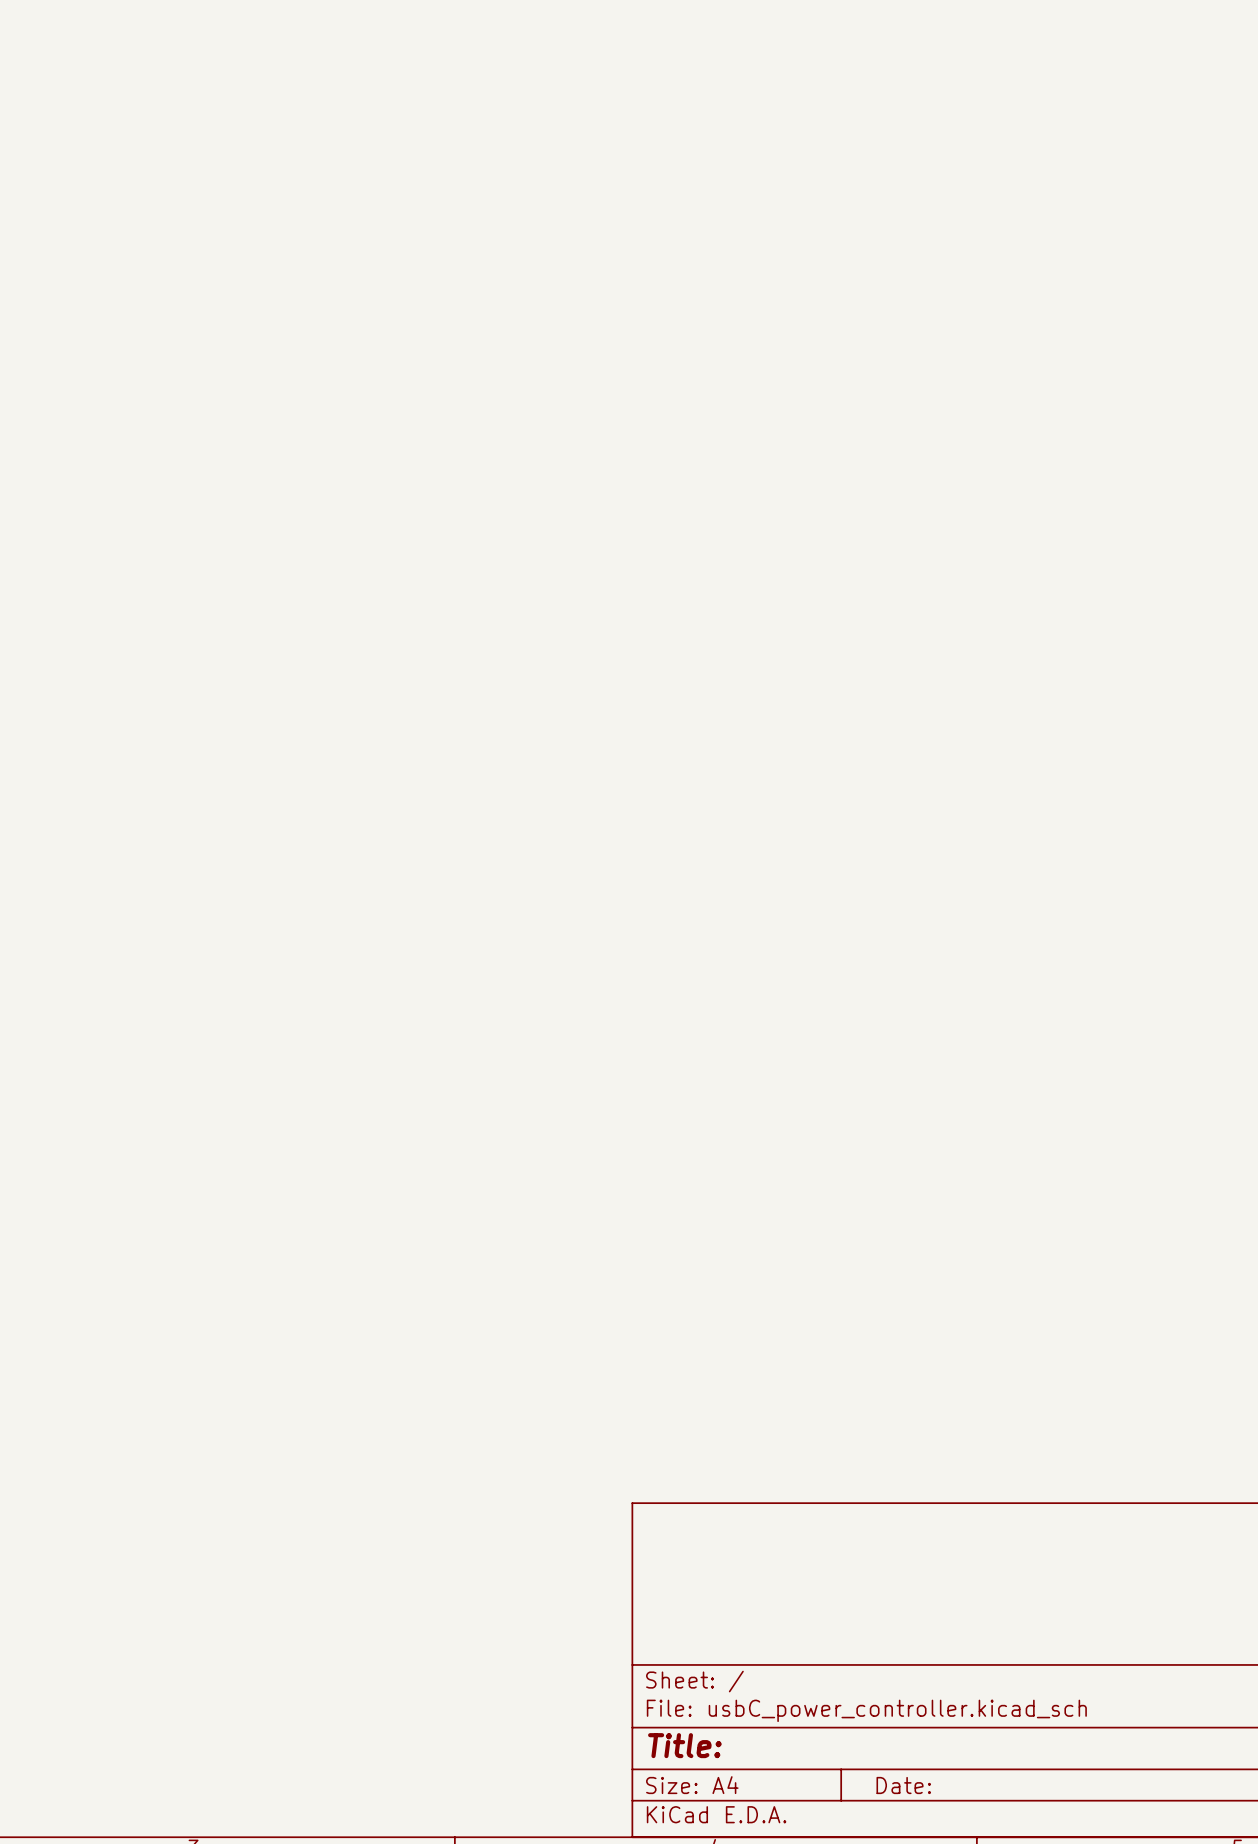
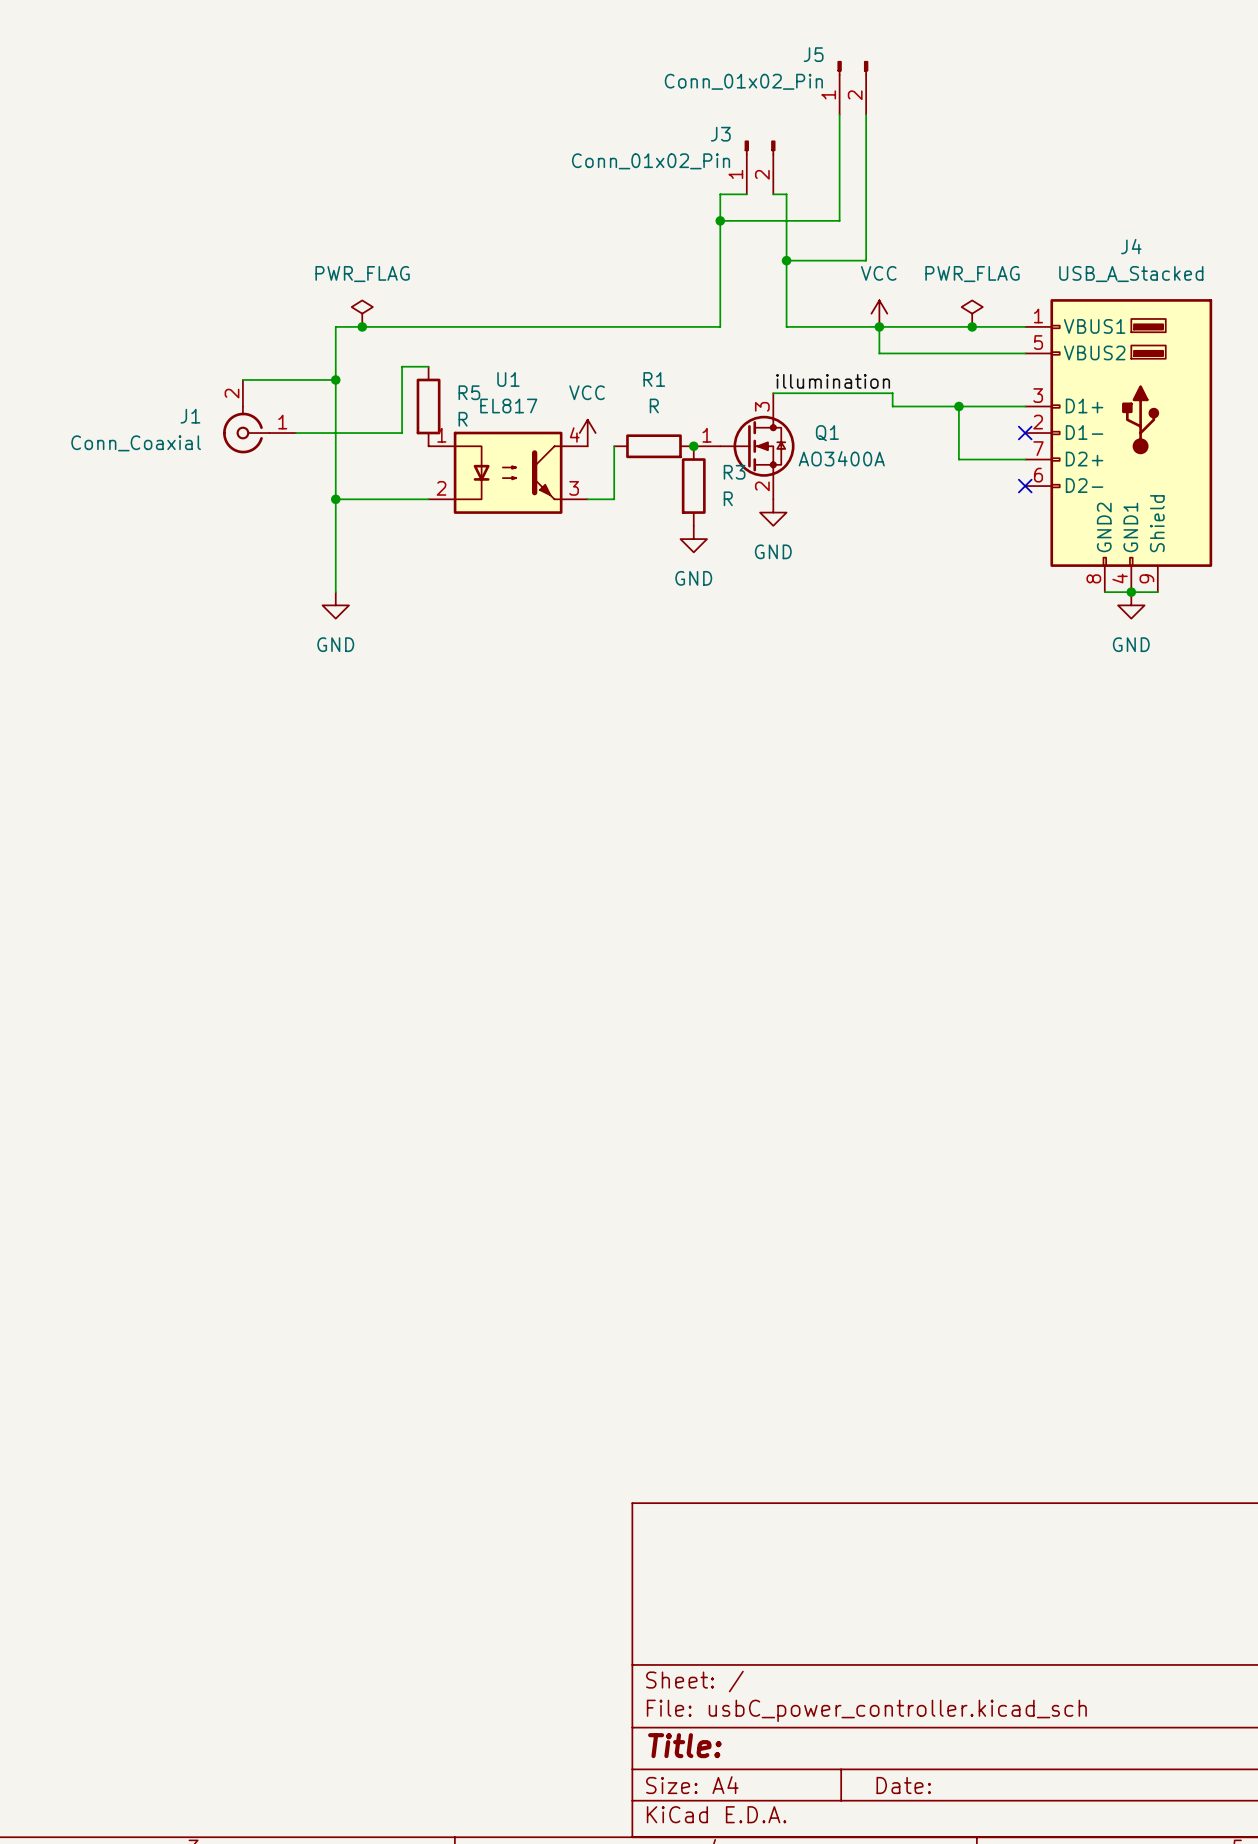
J5: none -> Conn_01x02_Pin (852, 87)
wire: none -> (839, 114) (839, 220) (720, 220)
wire: none -> (866, 114) (866, 260) (786, 260)
J3: none -> Conn_01x02_Pin (760, 167)
wire: none -> (746, 194) (720, 194) (720, 326) (335, 326) (335, 592)
wire: none -> (773, 194) (786, 194) (786, 326) (1025, 326)
junction: none -> (720, 220)
junction: none -> (786, 260)
power symbol: none -> PWR_FLAG (362, 313)
power symbol: none -> VCC (879, 313)
power symbol: none -> PWR_FLAG (972, 313)
junction: none -> (362, 326)
wire: none -> (879, 326) (879, 353) (1025, 353)
junction: none -> (879, 326)
junction: none -> (972, 326)
wire: none -> (428, 366) (402, 366) (402, 433) (295, 433)
wire: none -> (242, 379) (335, 379)
junction: none -> (335, 379)
label: none -> illumination (833, 381)
wire: none -> (773, 393) (892, 393) (892, 406) (1025, 406)
R5: none -> R (428, 406)
wire: none -> (958, 406) (958, 459) (1025, 459)
junction: none -> (958, 406)
J1: none -> Conn_Coaxial (259, 416)
power symbol: none -> VCC (587, 433)
no-connect mark: none -> (1025, 433)
J4: none -> USB_A_Stacked (1118, 445)
wire: none -> (614, 446) (614, 499) (587, 499)
R1: none -> R (653, 446)
junction: none -> (693, 446)
Q1: none -> AO3400A (744, 446)
U1: none -> EL817 (508, 472)
R3: none -> R (693, 486)
no-connect mark: none -> (1025, 486)
wire: none -> (335, 499) (428, 499)
junction: none -> (335, 499)
power symbol: none -> GND (773, 512)
power symbol: none -> GND (693, 539)
wire: none -> (1104, 592) (1157, 592)
junction: none -> (1131, 592)
power symbol: none -> GND (335, 605)
power symbol: none -> GND (1131, 605)

